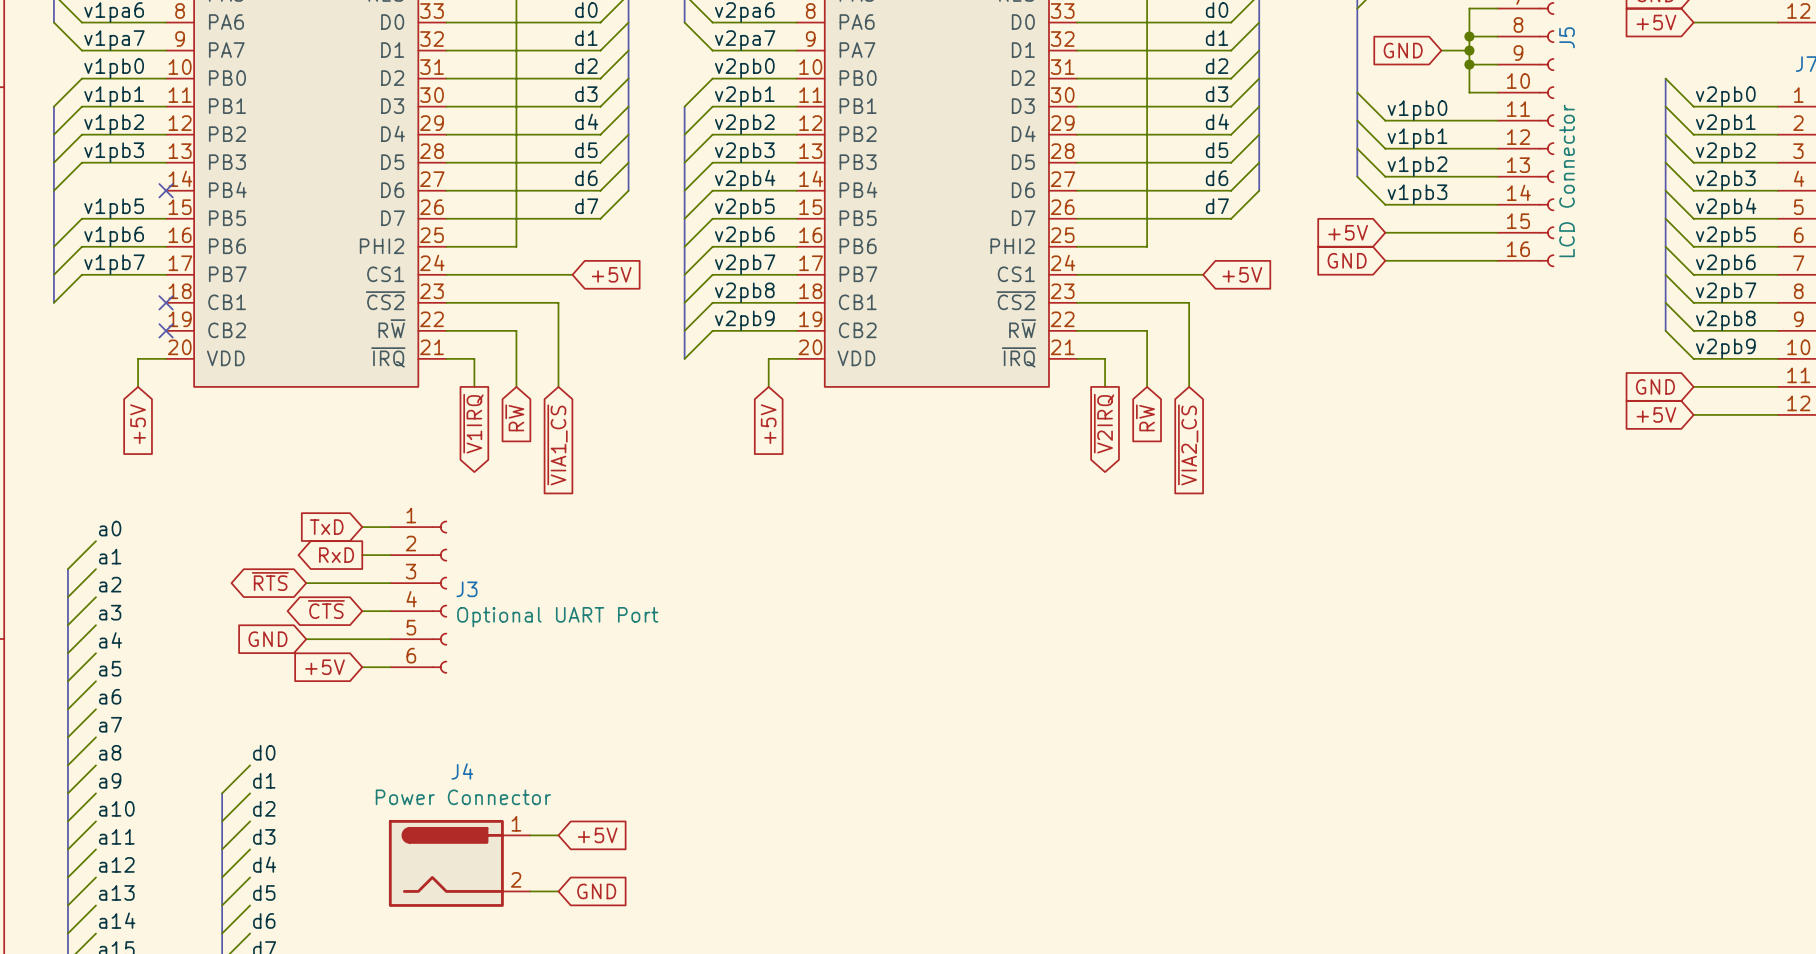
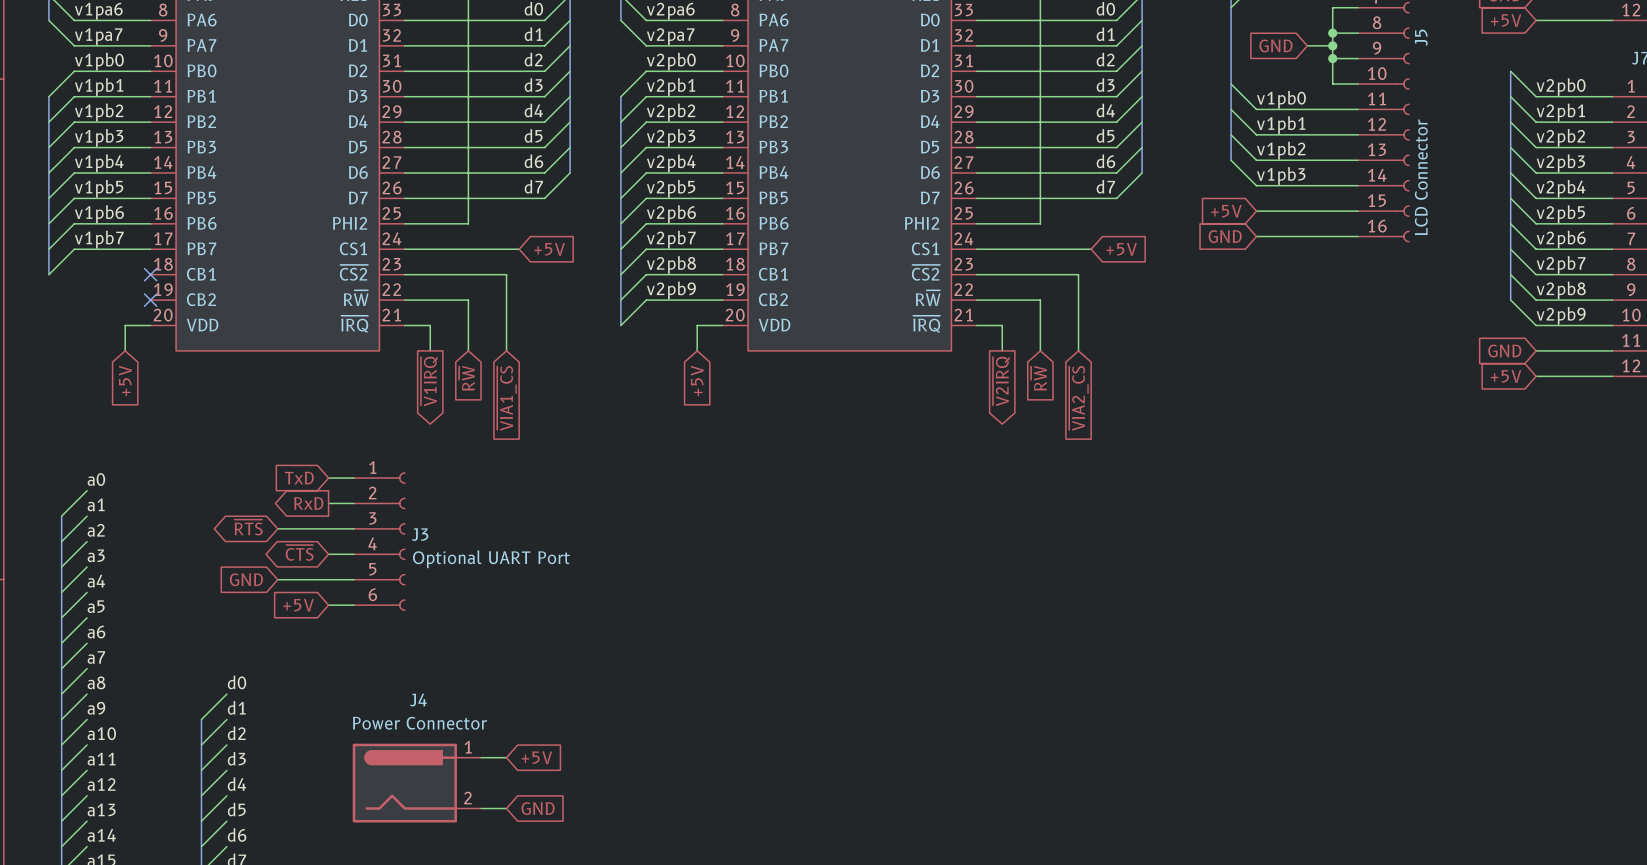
label: none -> v1pb4 (99, 163)
wire: none -> (150, 172) (74, 172) (48, 198)
no-connect mark: (166, 190) -> none

